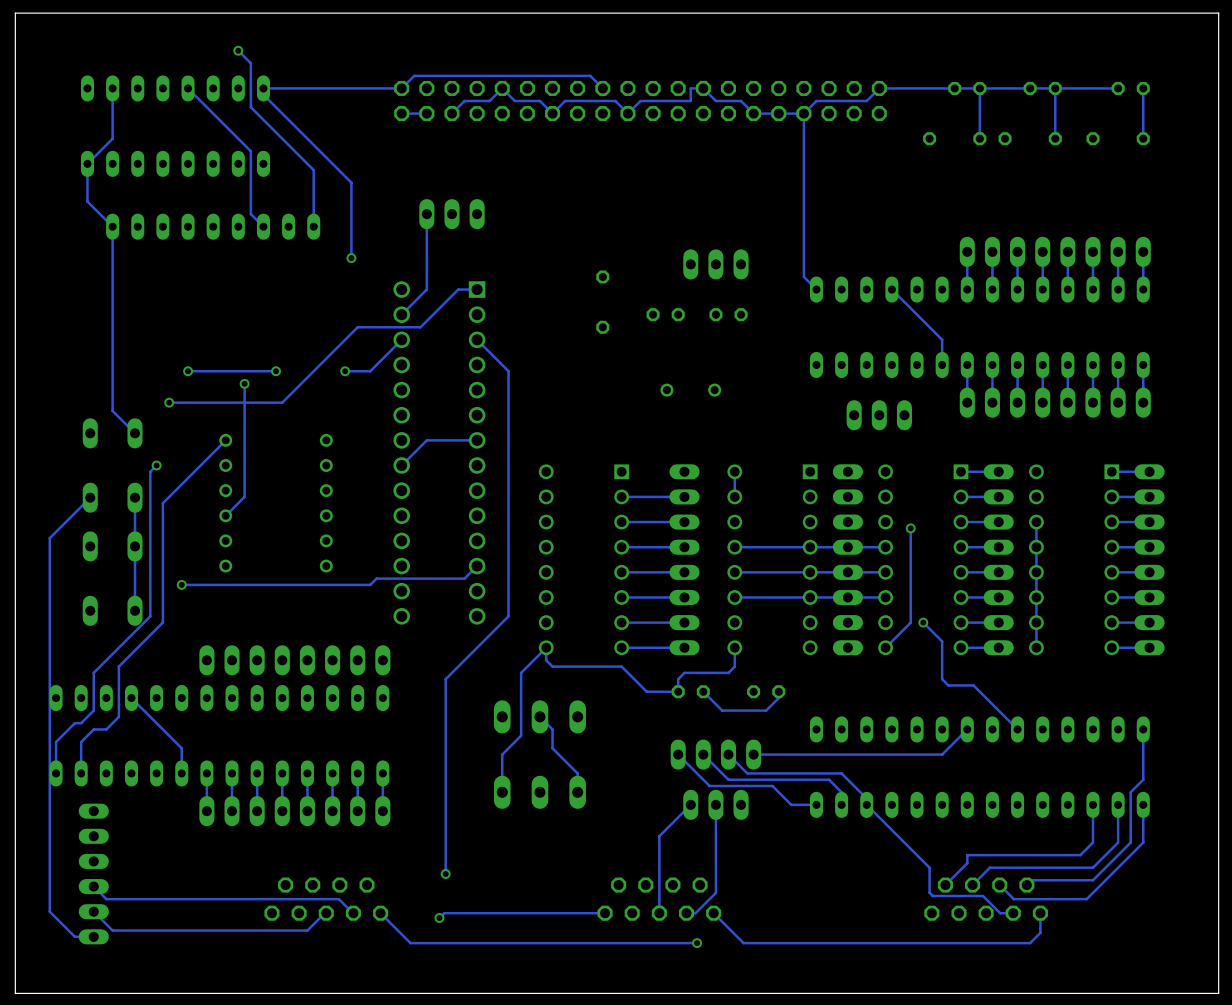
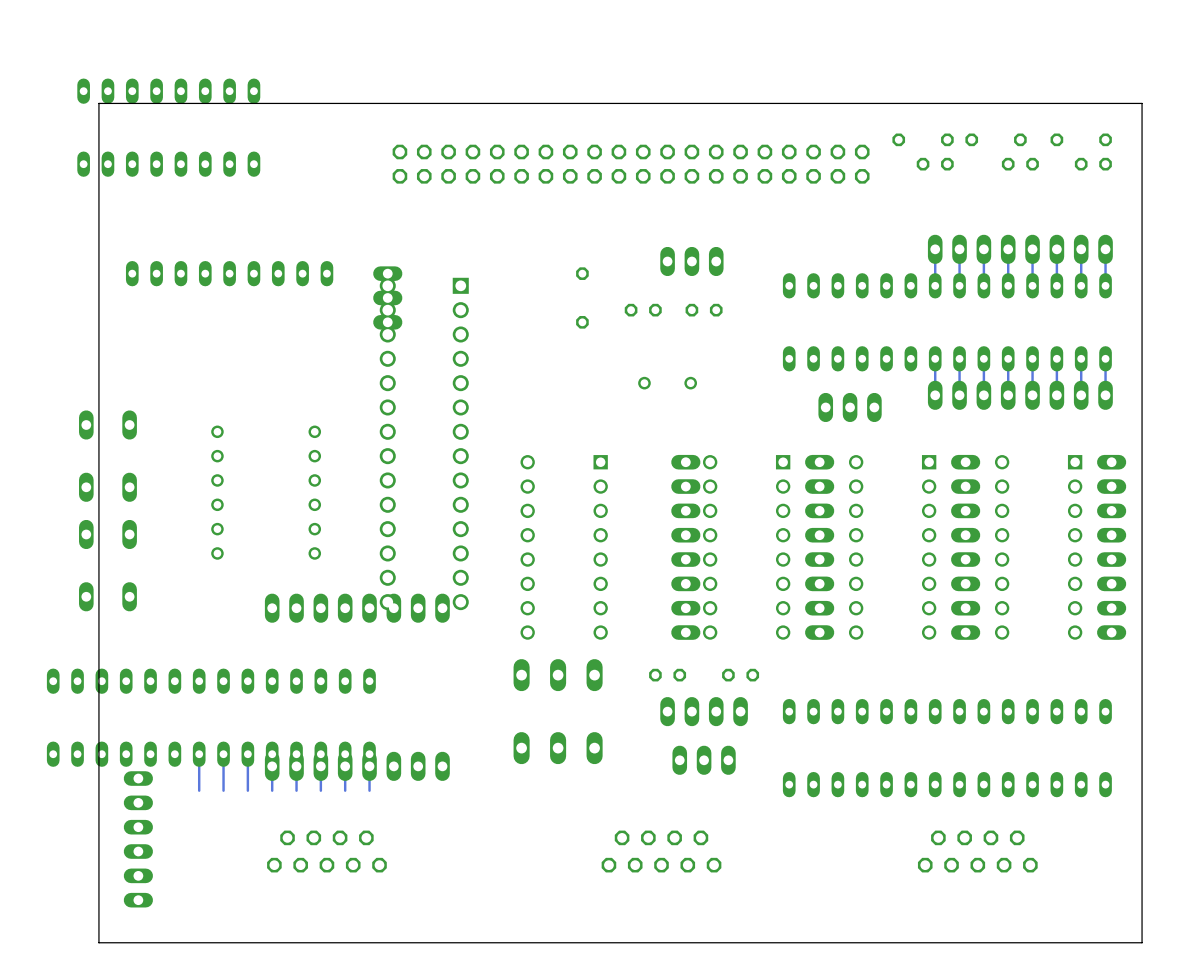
board edge: (1218, 13) (15, 13) (15, 993) (1218, 993) (1218, 13) -> (1142, 103) (1142, 942) (98, 942) (98, 103) (1142, 103)
track: (238, 50) (250, 63) (250, 107) (313, 170) (313, 226) -> none
via: (238, 50) -> none
track: (112, 88) (112, 138) (87, 163) (87, 201) (112, 226) (112, 410) (134, 433) -> none
track: (188, 88) (250, 151) (250, 214) (263, 226) -> none
track: (602, 88) (590, 75) (414, 75) (401, 88) (263, 88) (263, 94) (351, 182) (351, 258) -> none
part: (967, 88) -> none
track: (979, 88) (979, 138) -> none
part: (1042, 88) -> none
track: (1055, 88) (1055, 138) -> none
track: (1118, 88) (879, 88) (866, 101) (816, 101) (803, 113) -> none
part: (1130, 88) -> none
track: (1143, 88) (1143, 138) -> none
part position: (640, 101) -> (631, 164)
track: (426, 113) (401, 113) -> none
track: (803, 113) (753, 113) (741, 101) (715, 101) (703, 88) (690, 88) (690, 101) (640, 101) (627, 113) (615, 101) (565, 101) (552, 113) (539, 101) (514, 101) (502, 88) (489, 101) (464, 101) (451, 113) -> none
track: (803, 113) (803, 276) (816, 289) -> none
part: none -> (935, 164)
part: none -> (1020, 164)
part: none -> (1093, 164)
track: (426, 214) (426, 289) (401, 314) -> none
part rotation: 0° (451, 214) -> 90° clockwise (387, 297)
part position: (451, 214) -> (387, 297)
part position: (213, 226) -> (229, 273)
via: (351, 258) -> none
track: (477, 289) (458, 289) (420, 327) (357, 327) (282, 402) (169, 402) -> none
track: (891, 289) (942, 339) (942, 364) -> none
track: (401, 339) (370, 371) (345, 371) -> none
track: (477, 339) (508, 371) (508, 616) (445, 679) (445, 873) -> none
via: (188, 371) -> none
track: (276, 371) (188, 371) -> none
via: (276, 371) -> none
via: (345, 371) -> none
track: (244, 383) (244, 496) (225, 515) -> none
via: (244, 383) -> none
via: (169, 402) -> none
track: (225, 440) (162, 503) (162, 622) (118, 666) (118, 716) (106, 729) (93, 729) (81, 742) (81, 773) -> none
track: (477, 440) (426, 440) (401, 465) -> none
track: (156, 465) (150, 471) (150, 616) (93, 672) (93, 710) (81, 723) (74, 723) (56, 742) (56, 773) -> none
via: (156, 465) -> none
track: (734, 471) (734, 496) -> none
track: (998, 471) (961, 471) -> none
track: (1149, 471) (1111, 471) -> none
track: (684, 496) (621, 496) -> none
track: (998, 496) (961, 496) -> none
track: (1149, 496) (1111, 496) -> none
track: (90, 497) (49, 538) (49, 911) (74, 936) (93, 936) -> none
track: (134, 497) (134, 610) -> none
track: (684, 522) (621, 522) -> none
track: (998, 522) (961, 522) -> none
track: (1036, 522) (1036, 647) -> none
track: (1149, 522) (1111, 522) -> none
track: (910, 528) (910, 622) (885, 647) -> none
via: (910, 528) -> none
track: (684, 547) (621, 547) -> none
track: (885, 547) (734, 547) -> none
track: (998, 547) (961, 547) -> none
track: (1149, 547) (1111, 547) -> none
part position: (684, 559) -> (685, 547)
track: (477, 566) (464, 578) (376, 578) (370, 584) (181, 584) -> none
track: (684, 572) (621, 572) -> none
track: (885, 572) (734, 572) -> none
track: (998, 572) (961, 572) -> none
track: (1149, 572) (1111, 572) -> none
via: (181, 584) -> none
track: (684, 597) (621, 597) -> none
track: (885, 597) (734, 597) -> none
track: (998, 597) (961, 597) -> none
track: (1149, 597) (1111, 597) -> none
part: none -> (357, 608)
track: (684, 622) (621, 622) -> none
track: (923, 622) (942, 641) (942, 679) (948, 685) (973, 685) (1017, 729) -> none
via: (923, 622) -> none
track: (998, 622) (961, 622) -> none
track: (1149, 622) (1111, 622) -> none
track: (684, 647) (621, 647) -> none
track: (734, 647) (734, 666) (728, 672) (684, 672) (678, 679) (678, 691) (646, 691) (621, 666) (552, 666) (546, 660) (546, 647) (521, 672) (521, 735) (502, 754) (502, 792) -> none
track: (998, 647) (961, 647) -> none
track: (1149, 647) (1111, 647) -> none
part: (294, 660) -> none
part: none -> (558, 675)
track: (778, 691) (778, 698) (766, 710) (722, 710) (703, 691) -> none
track: (131, 698) (181, 748) (181, 773) -> none
track: (539, 716) (552, 729) (552, 748) (577, 773) (577, 792) -> none
part: (539, 716) -> none
track: (967, 729) (942, 754) (753, 754) -> none
track: (1143, 729) (1143, 779) (1130, 792) (1130, 842) (1092, 880) (1031, 880) (1026, 885) -> none
track: (678, 754) (709, 786) (772, 786) (791, 804) (816, 804) -> none
track: (703, 754) (728, 779) (829, 779) (841, 792) (841, 804) -> none
part position: (715, 754) -> (704, 711)
track: (728, 754) (747, 773) (841, 773) (866, 798) (866, 804) (929, 867) (929, 892) (932, 895) (983, 895) (1000, 913) (1013, 913) -> none
part: none -> (558, 748)
part: none -> (357, 766)
part: (539, 792) -> none
track: (690, 804) (659, 836) (659, 913) -> none
track: (715, 804) (715, 892) (695, 913) (686, 913) -> none
part position: (715, 804) -> (704, 760)
track: (1092, 804) (1092, 842) (1080, 855) (967, 855) (967, 863) (945, 885) -> none
track: (1118, 804) (1118, 842) (1092, 867) (989, 867) (972, 885) -> none
track: (1143, 804) (1143, 842) (1086, 899) (1013, 899) (999, 885) -> none
part: (294, 811) -> none
part position: (93, 873) -> (138, 839)
via: (445, 873) -> none
track: (93, 886) (106, 899) (338, 899) (353, 913) -> none
part position: (326, 899) -> (326, 851)
part position: (659, 899) -> (661, 851)
part position: (986, 899) -> (977, 851)
track: (93, 911) (112, 930) (307, 930) (326, 913) -> none
track: (380, 913) (410, 943) (697, 943) -> none
track: (605, 913) (444, 913) (439, 917) -> none
track: (1040, 913) (1040, 932) (1030, 943) (743, 943) (713, 913) -> none
via: (439, 917) -> none
via: (697, 943) -> none

